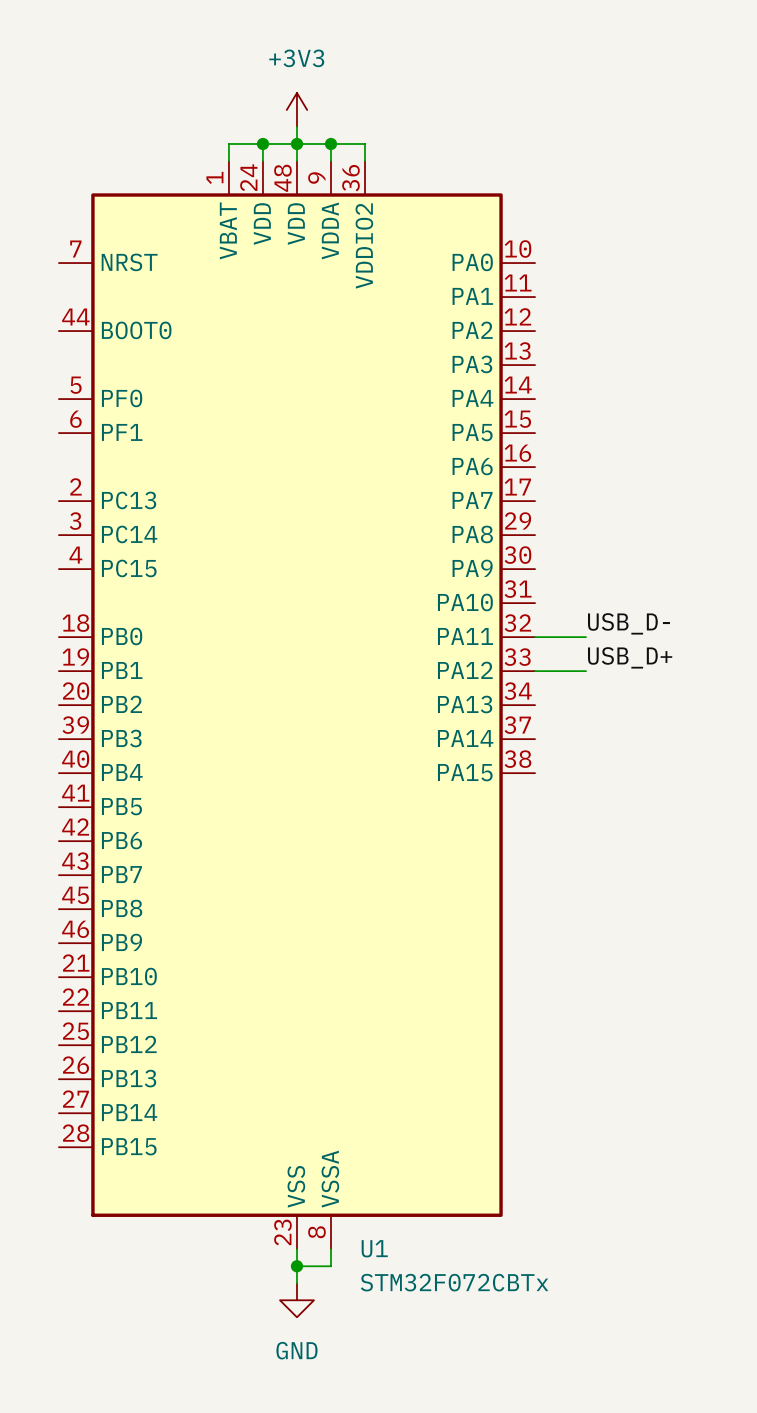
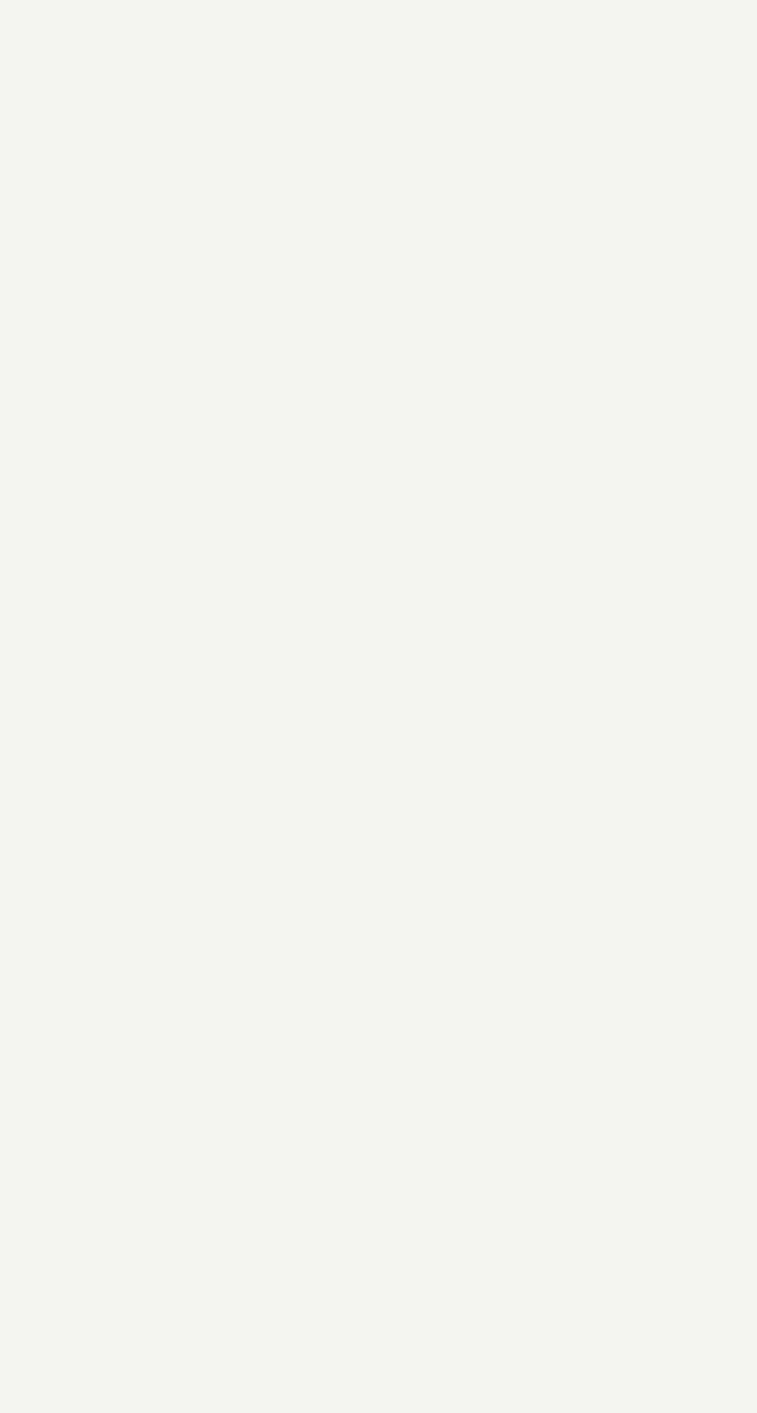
power symbol: +3V3 (296, 109) -> none
wire: (296, 126) (296, 161) -> none
wire: (262, 144) (262, 161) -> none
junction: (262, 144) -> none
junction: (296, 144) -> none
wire: (330, 144) (330, 161) -> none
junction: (330, 144) -> none
wire: (228, 161) (228, 144) (365, 144) (365, 161) -> none
label: USB_D- (628, 623) -> none
wire: (535, 637) (586, 637) -> none
label: USB_D+ (630, 657) -> none
wire: (535, 671) (586, 671) -> none
U1: STM32F072CBTx (296, 705) -> none
wire: (296, 1249) (296, 1283) -> none
wire: (330, 1249) (330, 1266) (296, 1266) -> none
junction: (296, 1266) -> none
power symbol: GND (296, 1300) -> none

